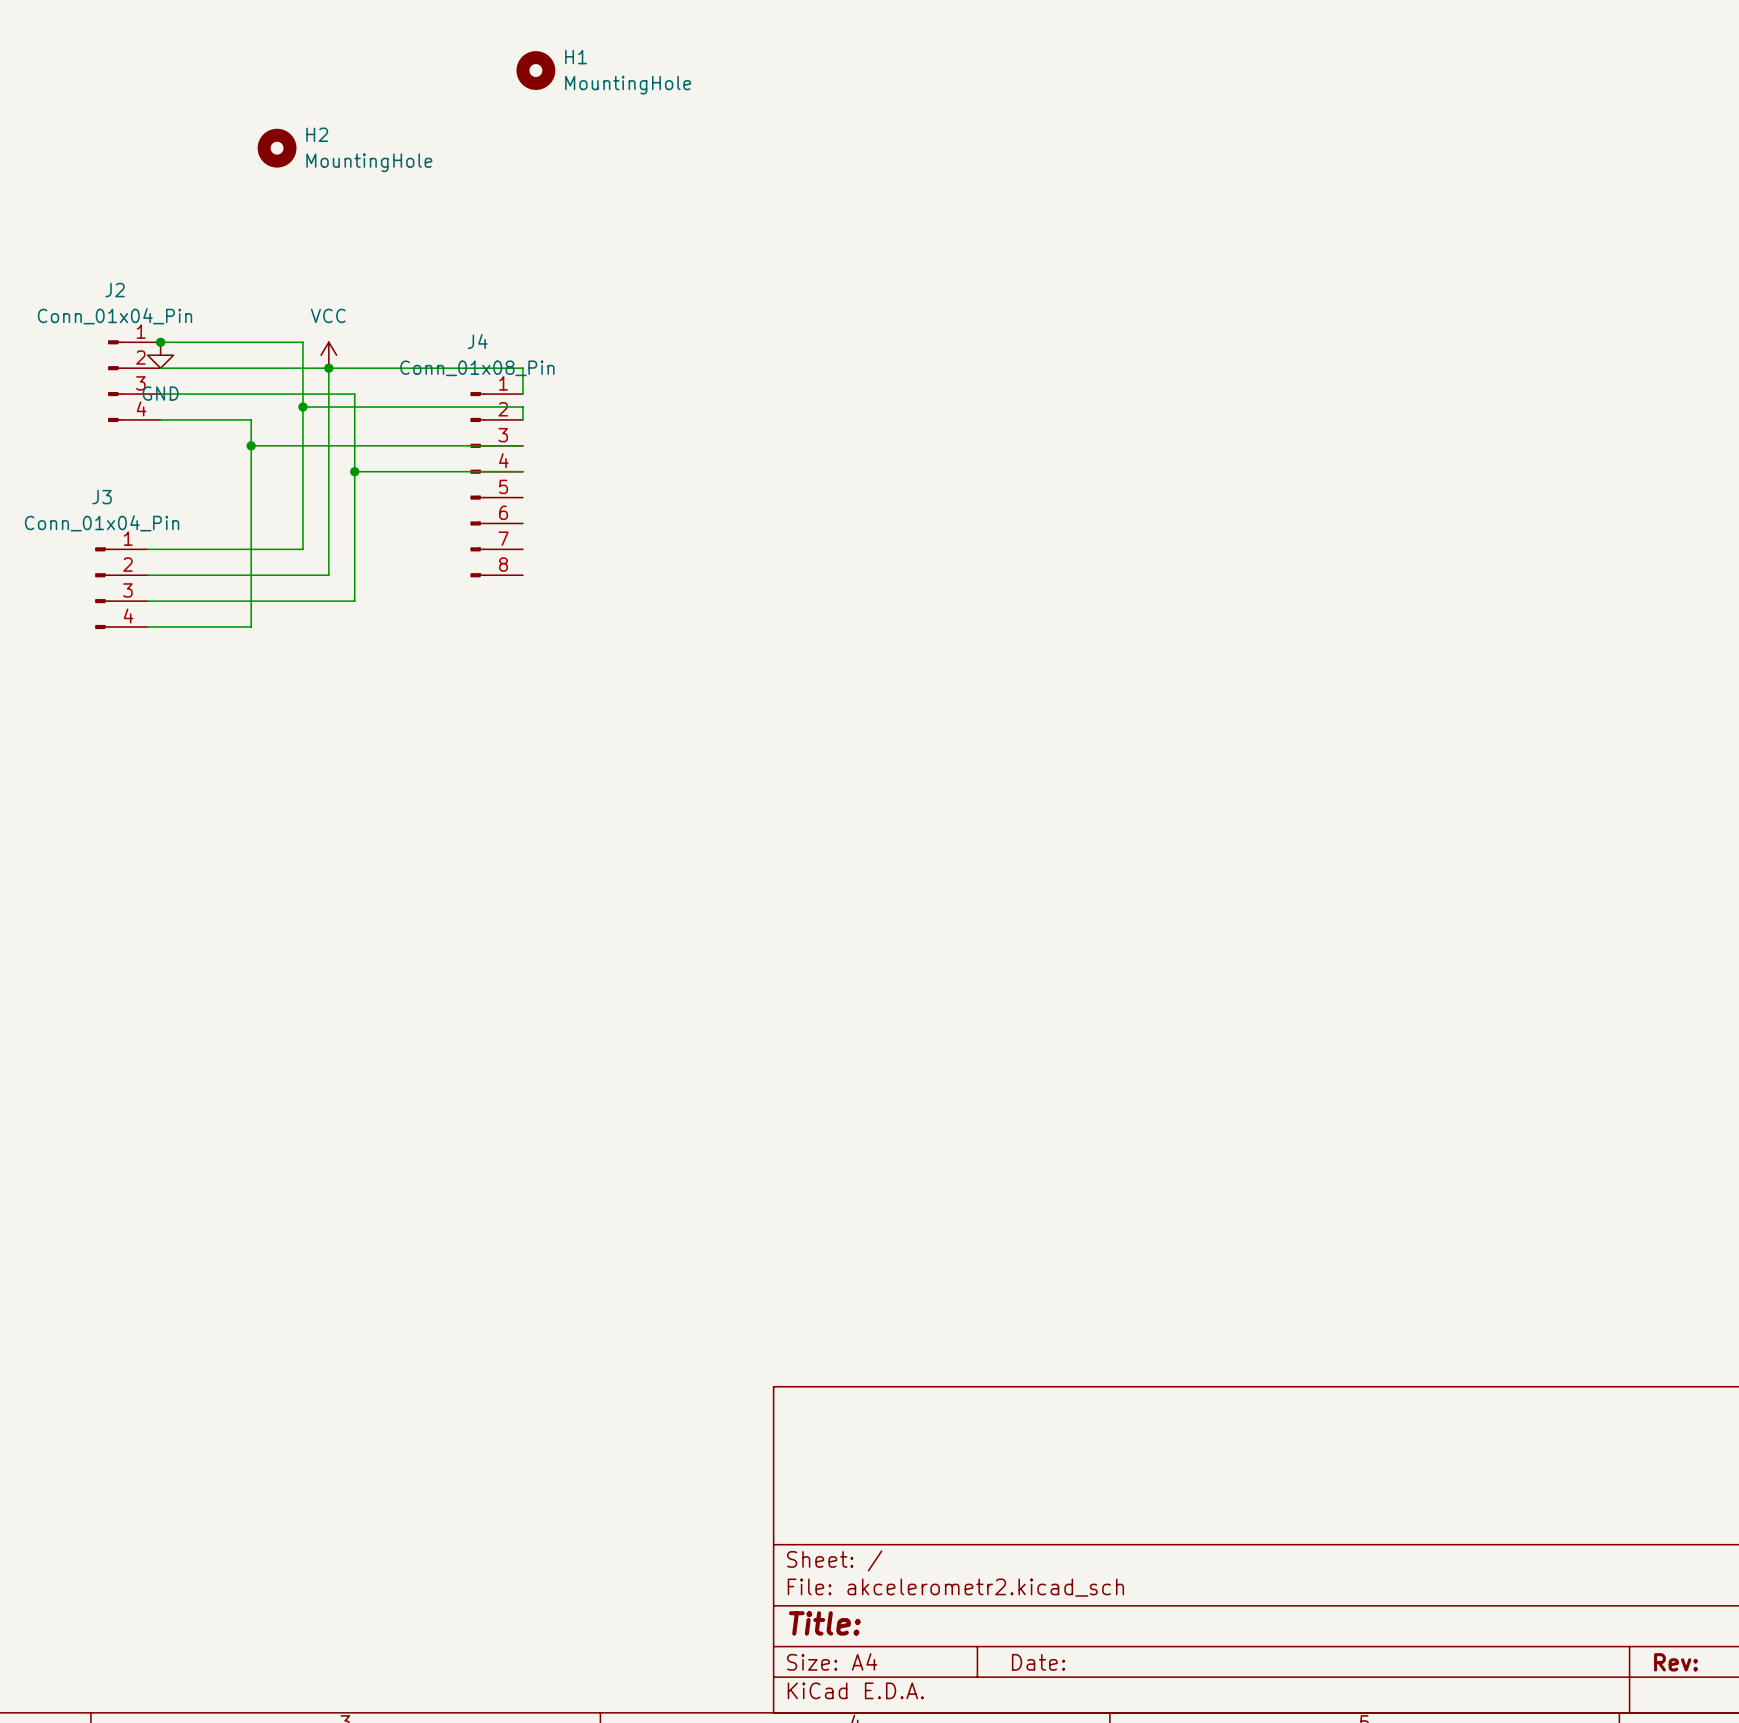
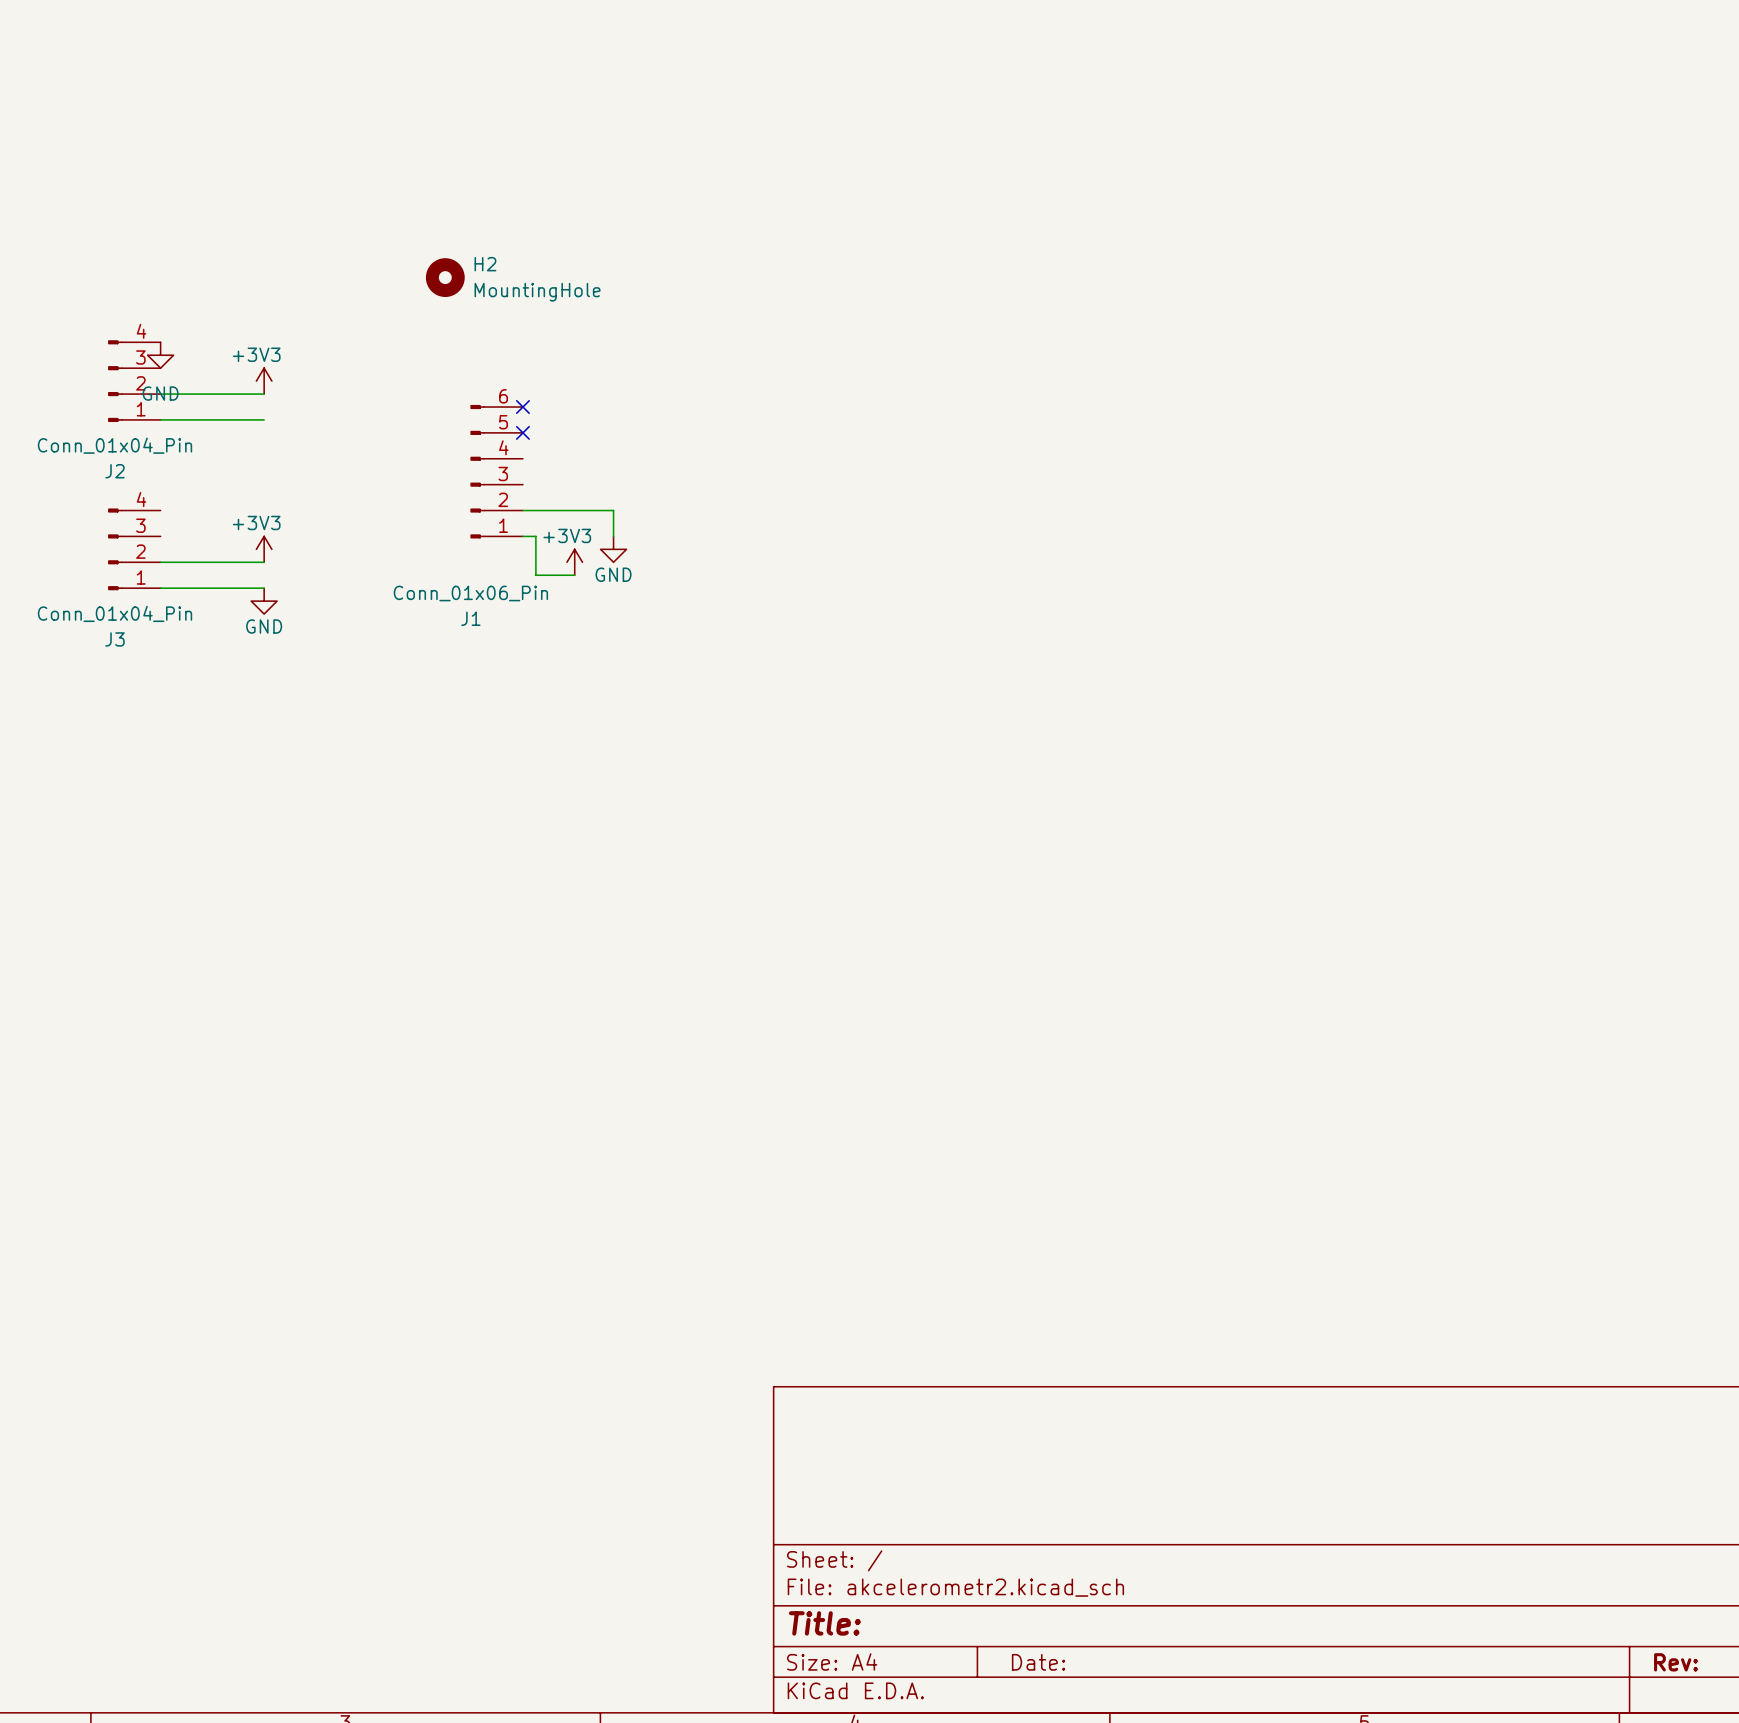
H1: MountingHole (535, 70) -> none
H2 position: (277, 148) -> (445, 277)
wire: (160, 342) (302, 342) (302, 549) (147, 549) -> none
junction: (160, 342) -> none
power symbol: VCC (328, 355) -> none
wire: (160, 368) (522, 368) (522, 394) -> none
wire: (328, 368) (328, 575) (147, 575) -> none
junction: (328, 368) -> none
J2 flip: as is (115, 381) -> up-down (115, 381)
power symbol: none -> +3V3 (264, 381)
wire: (264, 394) (354, 394) (354, 601) (147, 601) -> none
wire: (302, 407) (522, 407) (522, 419) -> none
junction: (302, 407) -> none
no-connect mark: none -> (522, 407)
wire: (251, 419) (251, 627) (147, 627) -> (251, 419) (264, 419)
no-connect mark: none -> (522, 432)
wire: (251, 445) (522, 445) -> none
junction: (251, 445) -> none
wire: (354, 471) (522, 471) -> none
junction: (354, 471) -> none
J1: none -> Conn_01x06_Pin (496, 471)
J4: Conn_01x08_Pin (496, 484) -> none
wire: none -> (522, 510) (613, 510) (613, 536)
wire: none -> (522, 536) (535, 536) (535, 575) (574, 575)
power symbol: none -> +3V3 (264, 549)
power symbol: none -> GND (613, 549)
wire: none -> (160, 562) (264, 562)
power symbol: none -> +3V3 (574, 562)
J3 flip: as is (102, 588) -> up-down (115, 549)
wire: none -> (160, 588) (264, 588)
power symbol: none -> GND (264, 601)

